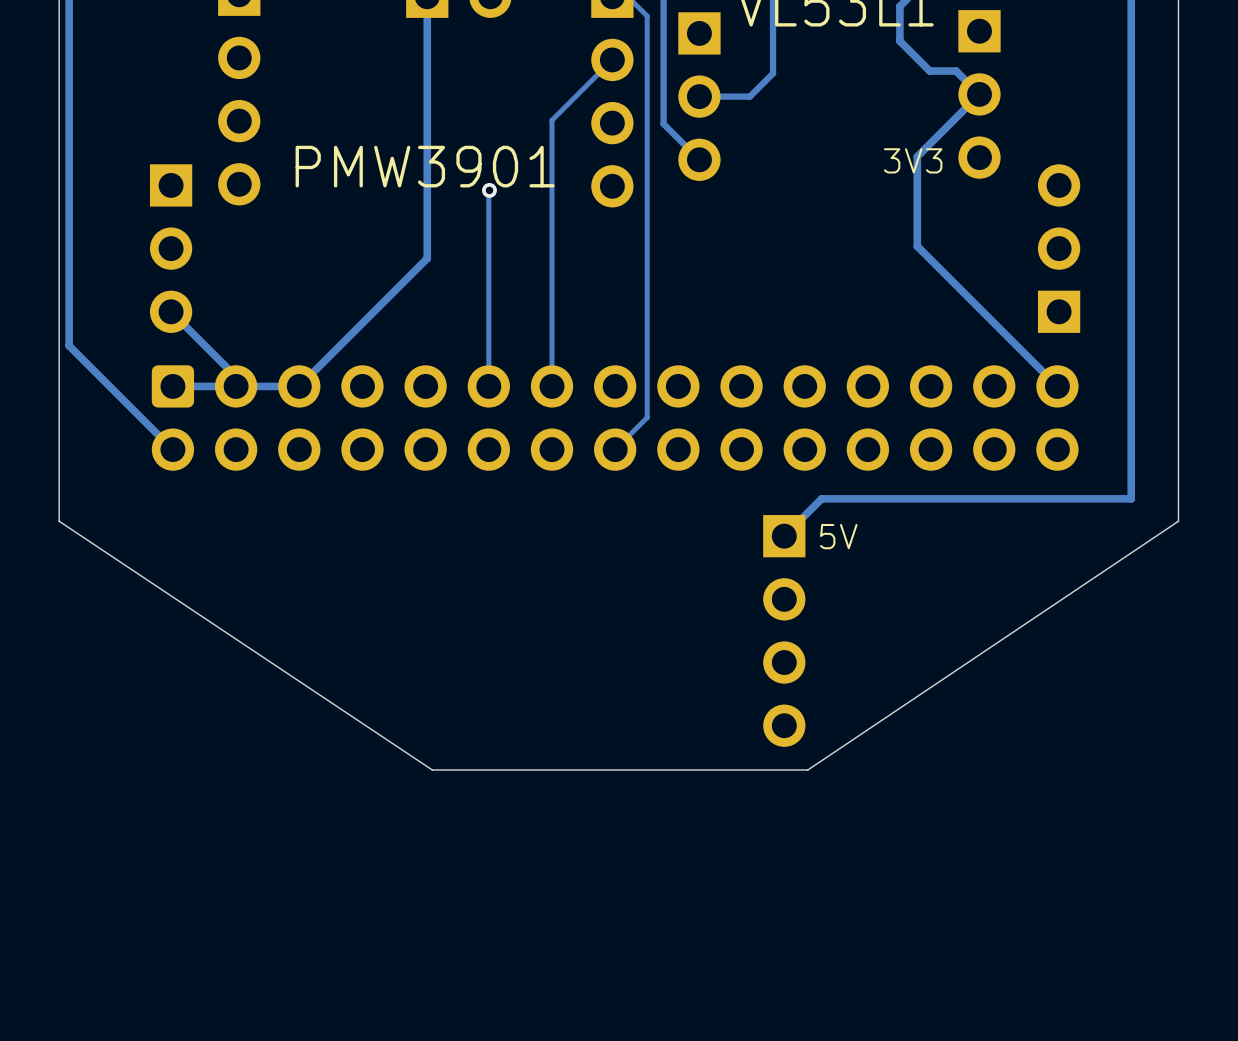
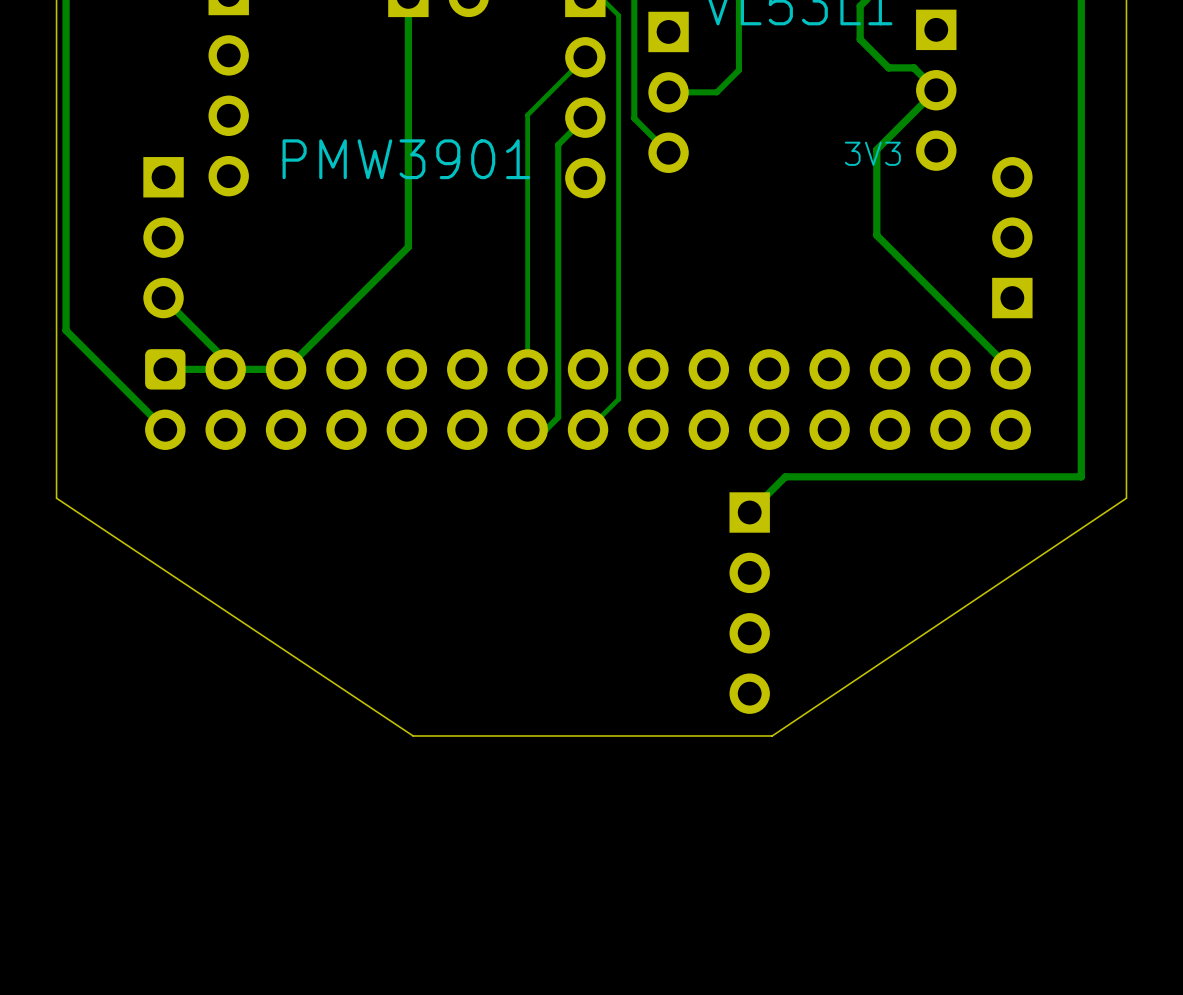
track: none -> (585, 117) (558, 144) (558, 417) (545, 429) (527, 429)
track: (489, 190) (488, 386) -> none
via: (489, 190) -> none
text: 5V (838, 536) -> none

